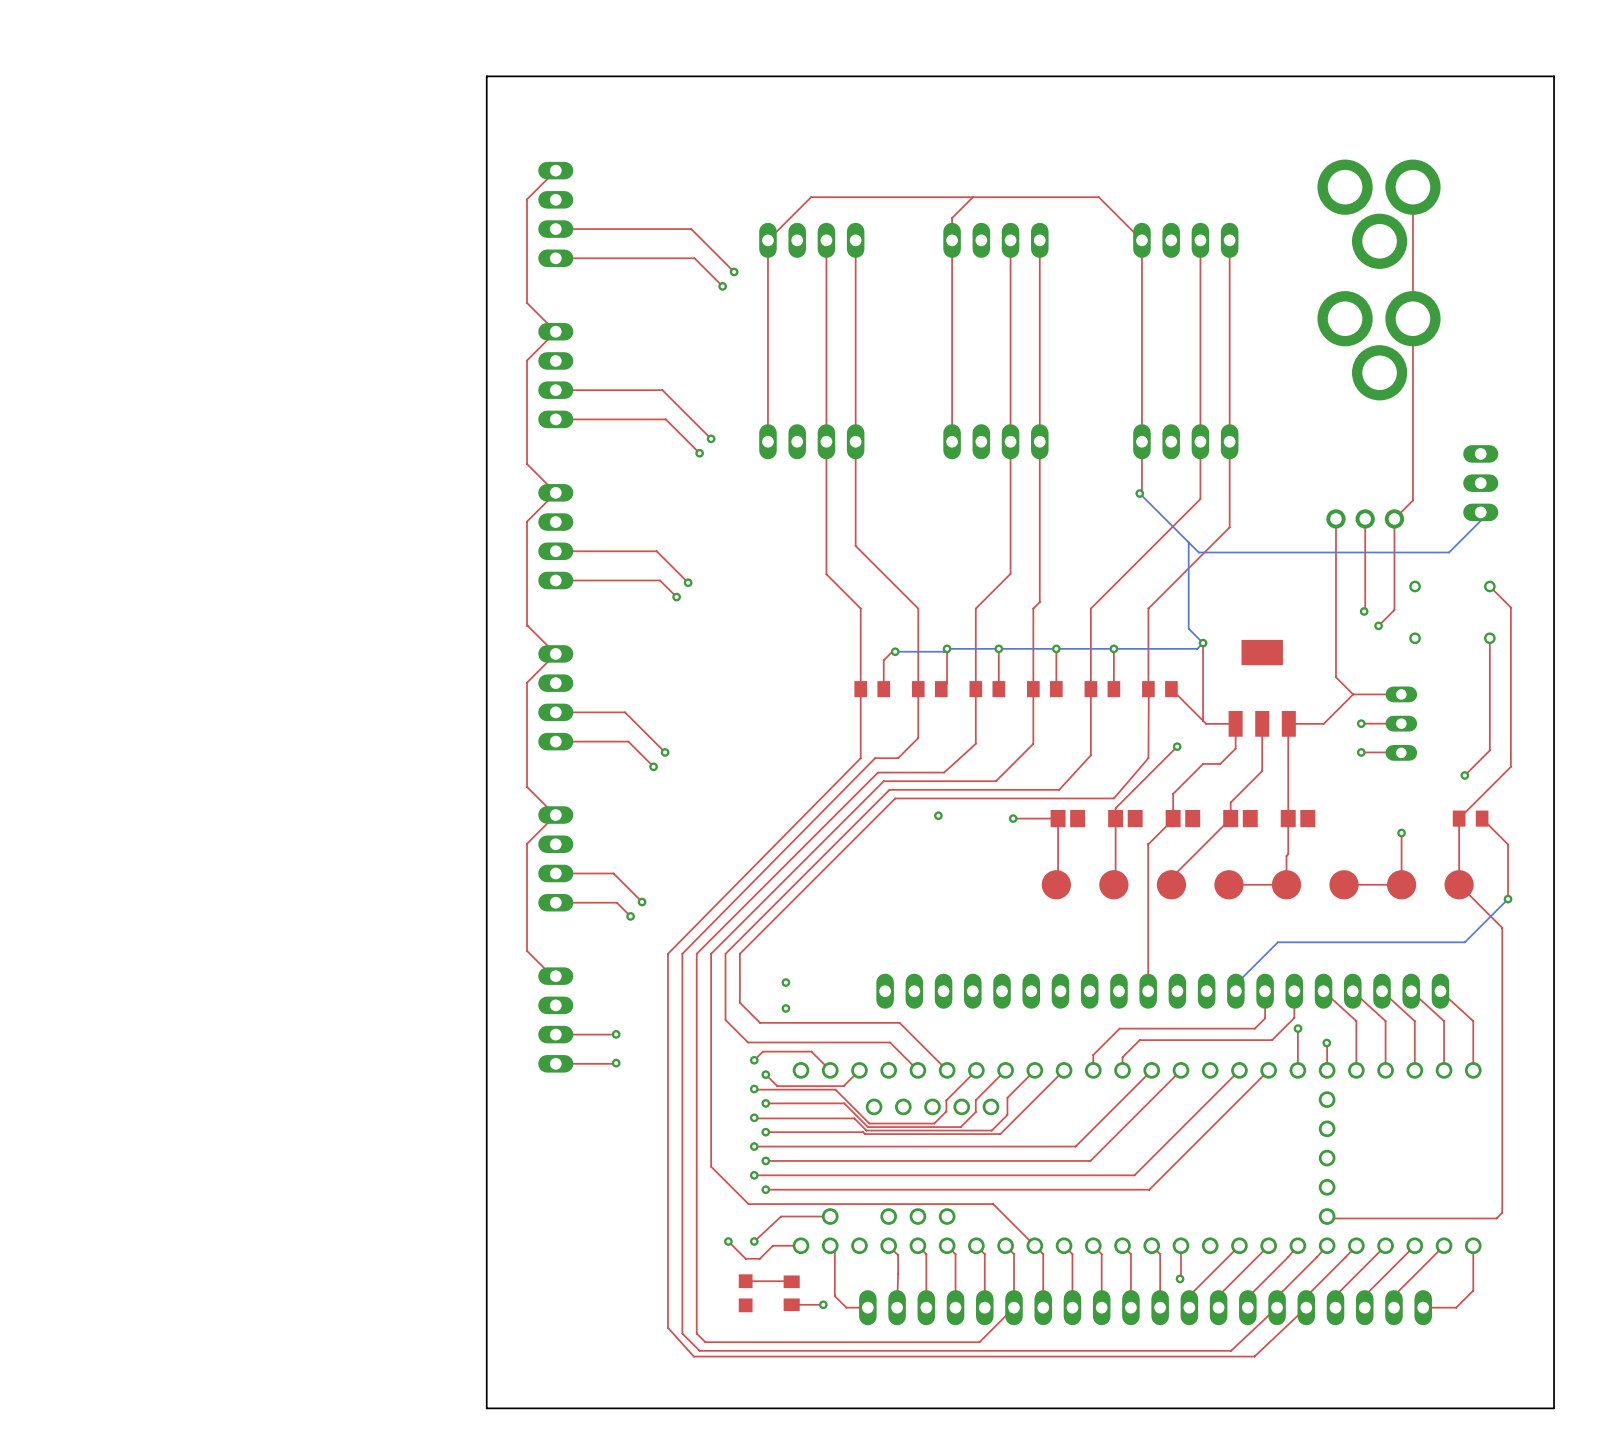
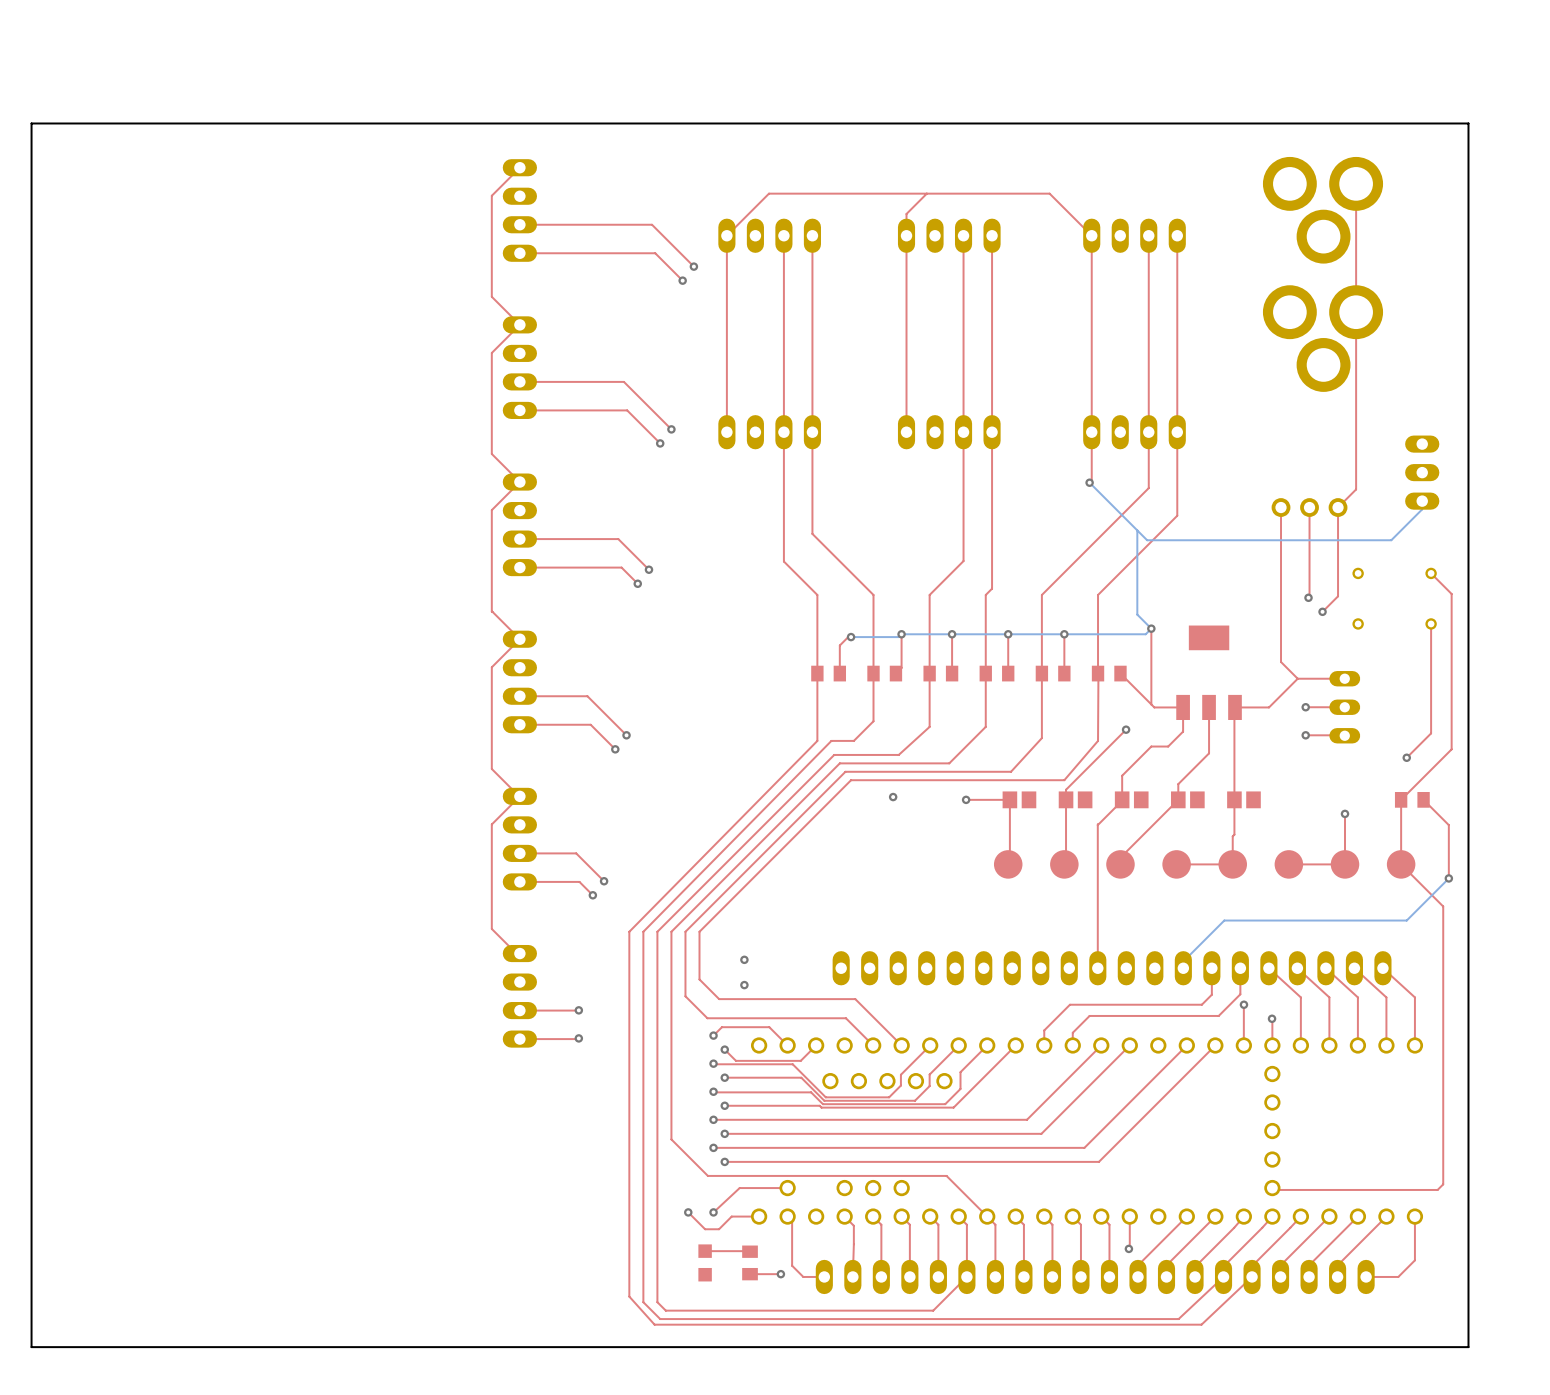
board edge: (1554, 76) (486, 76) (486, 1408) (1554, 1408) (1554, 76) -> (1468, 123) (1468, 1347) (31, 1347) (31, 123) (1468, 123)

